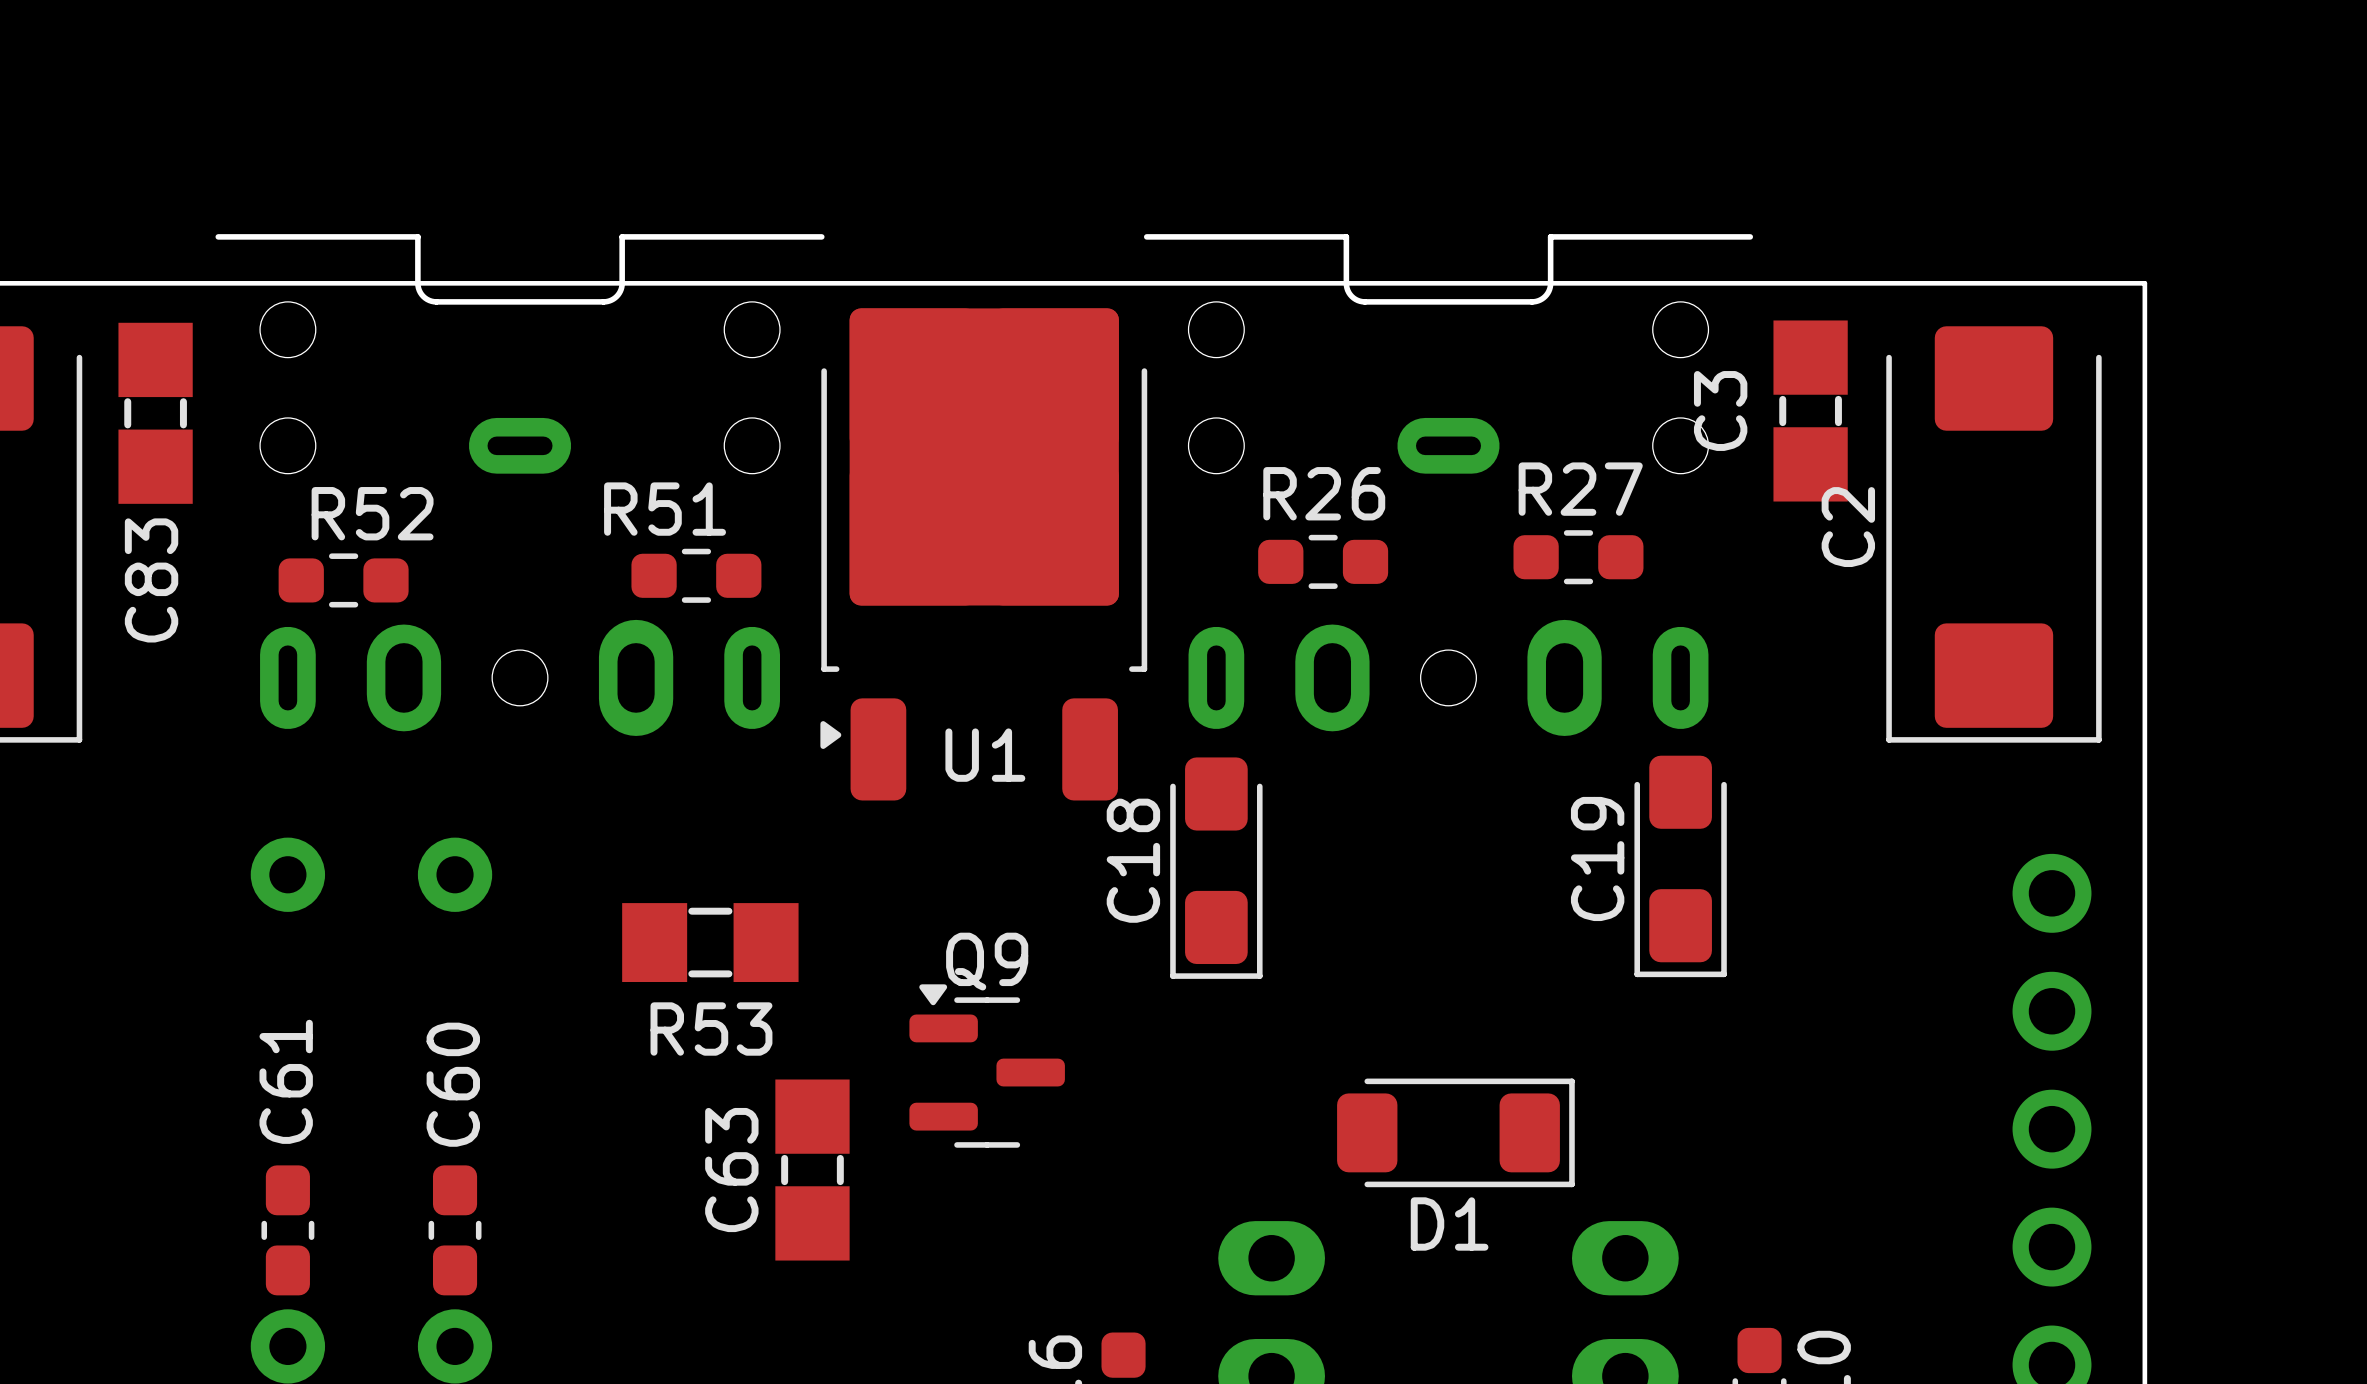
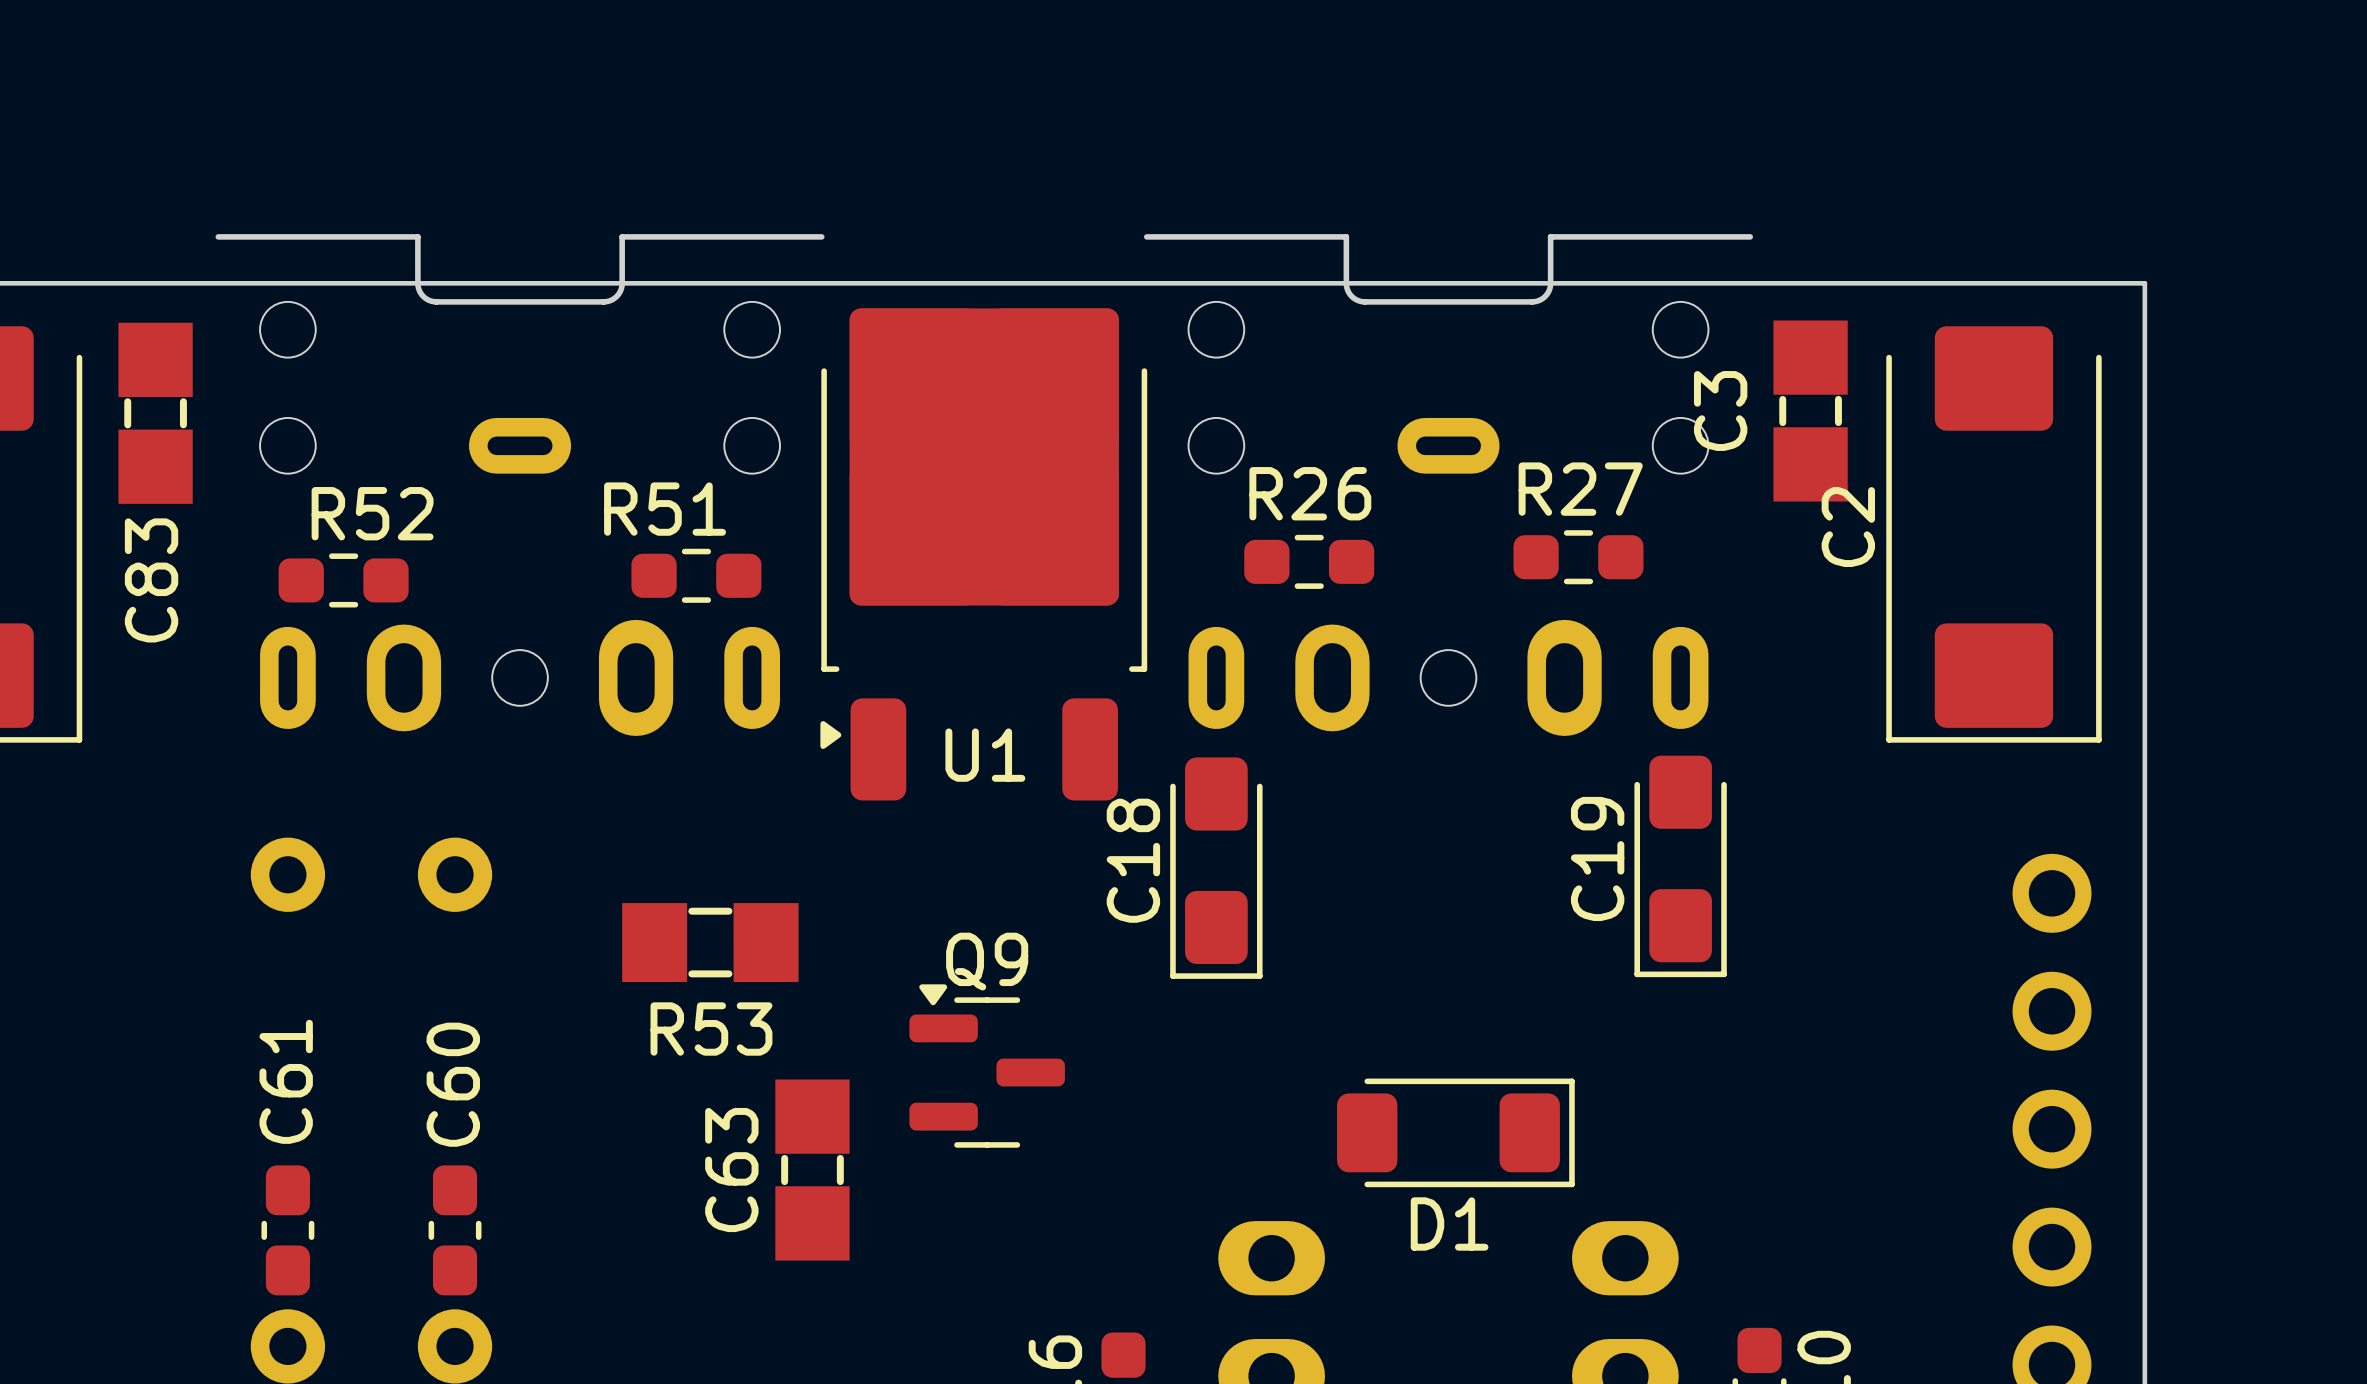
R26 position: (1323, 561) -> (1309, 561)

